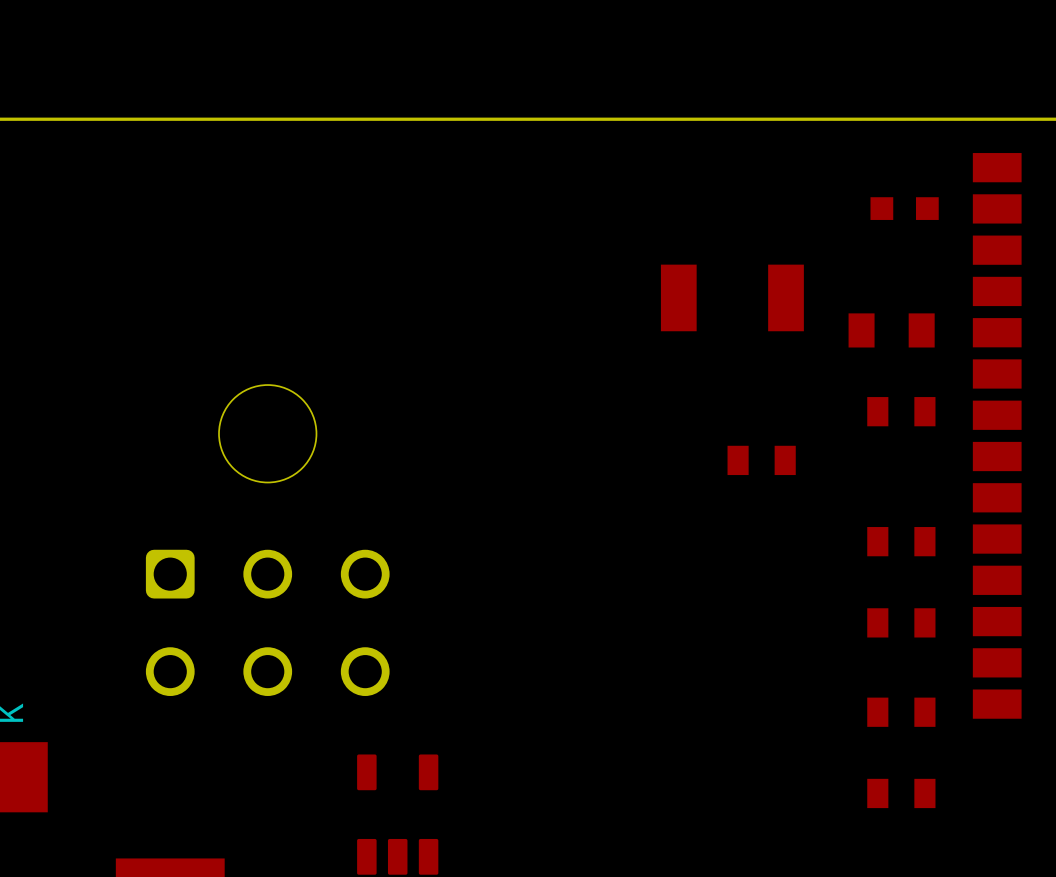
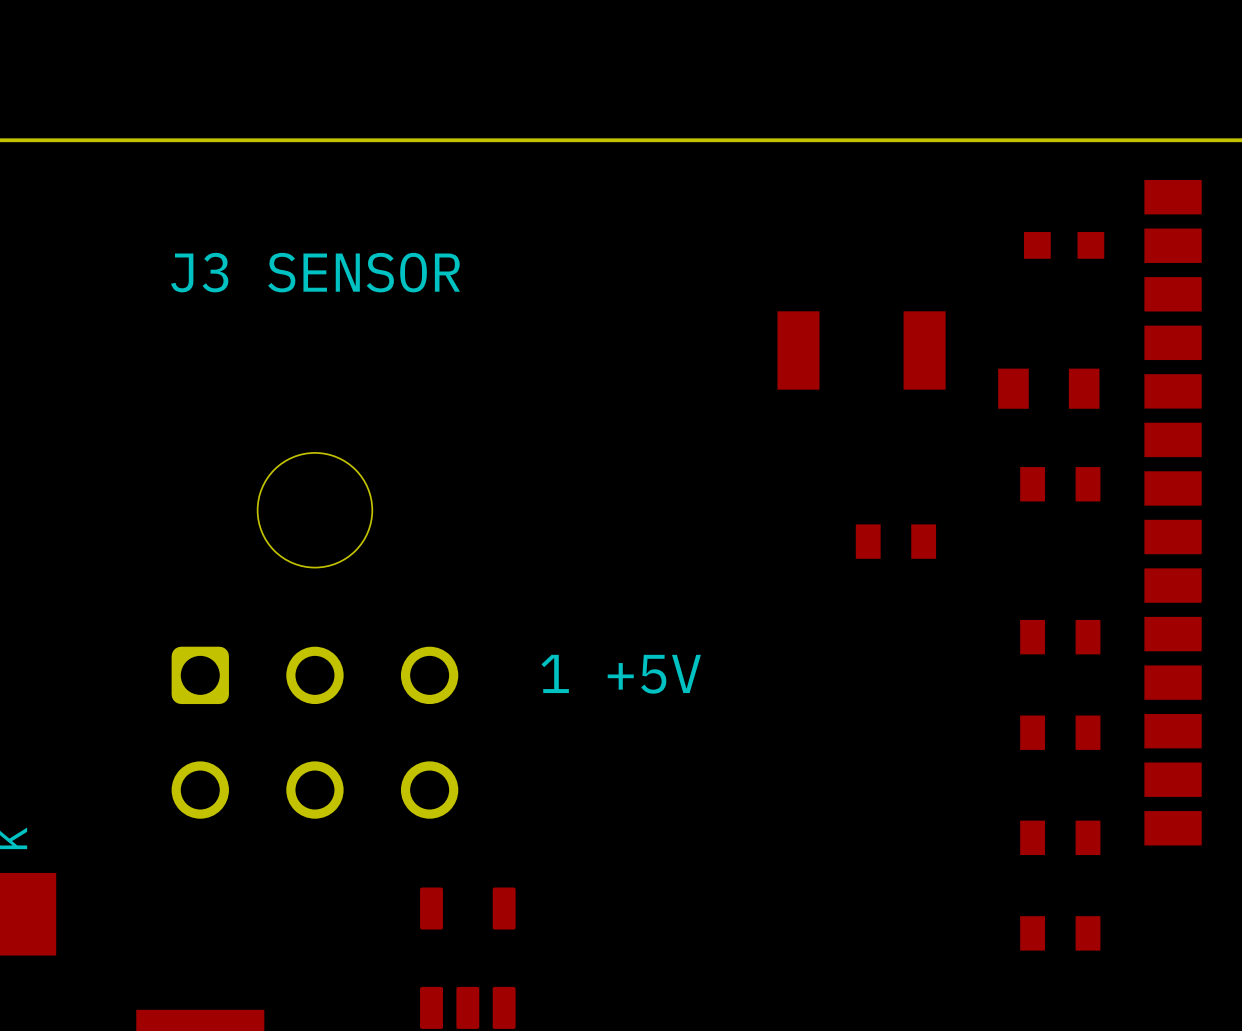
text: none -> J3 SENSOR (315, 272)
text: none -> 1 +5V (621, 674)

